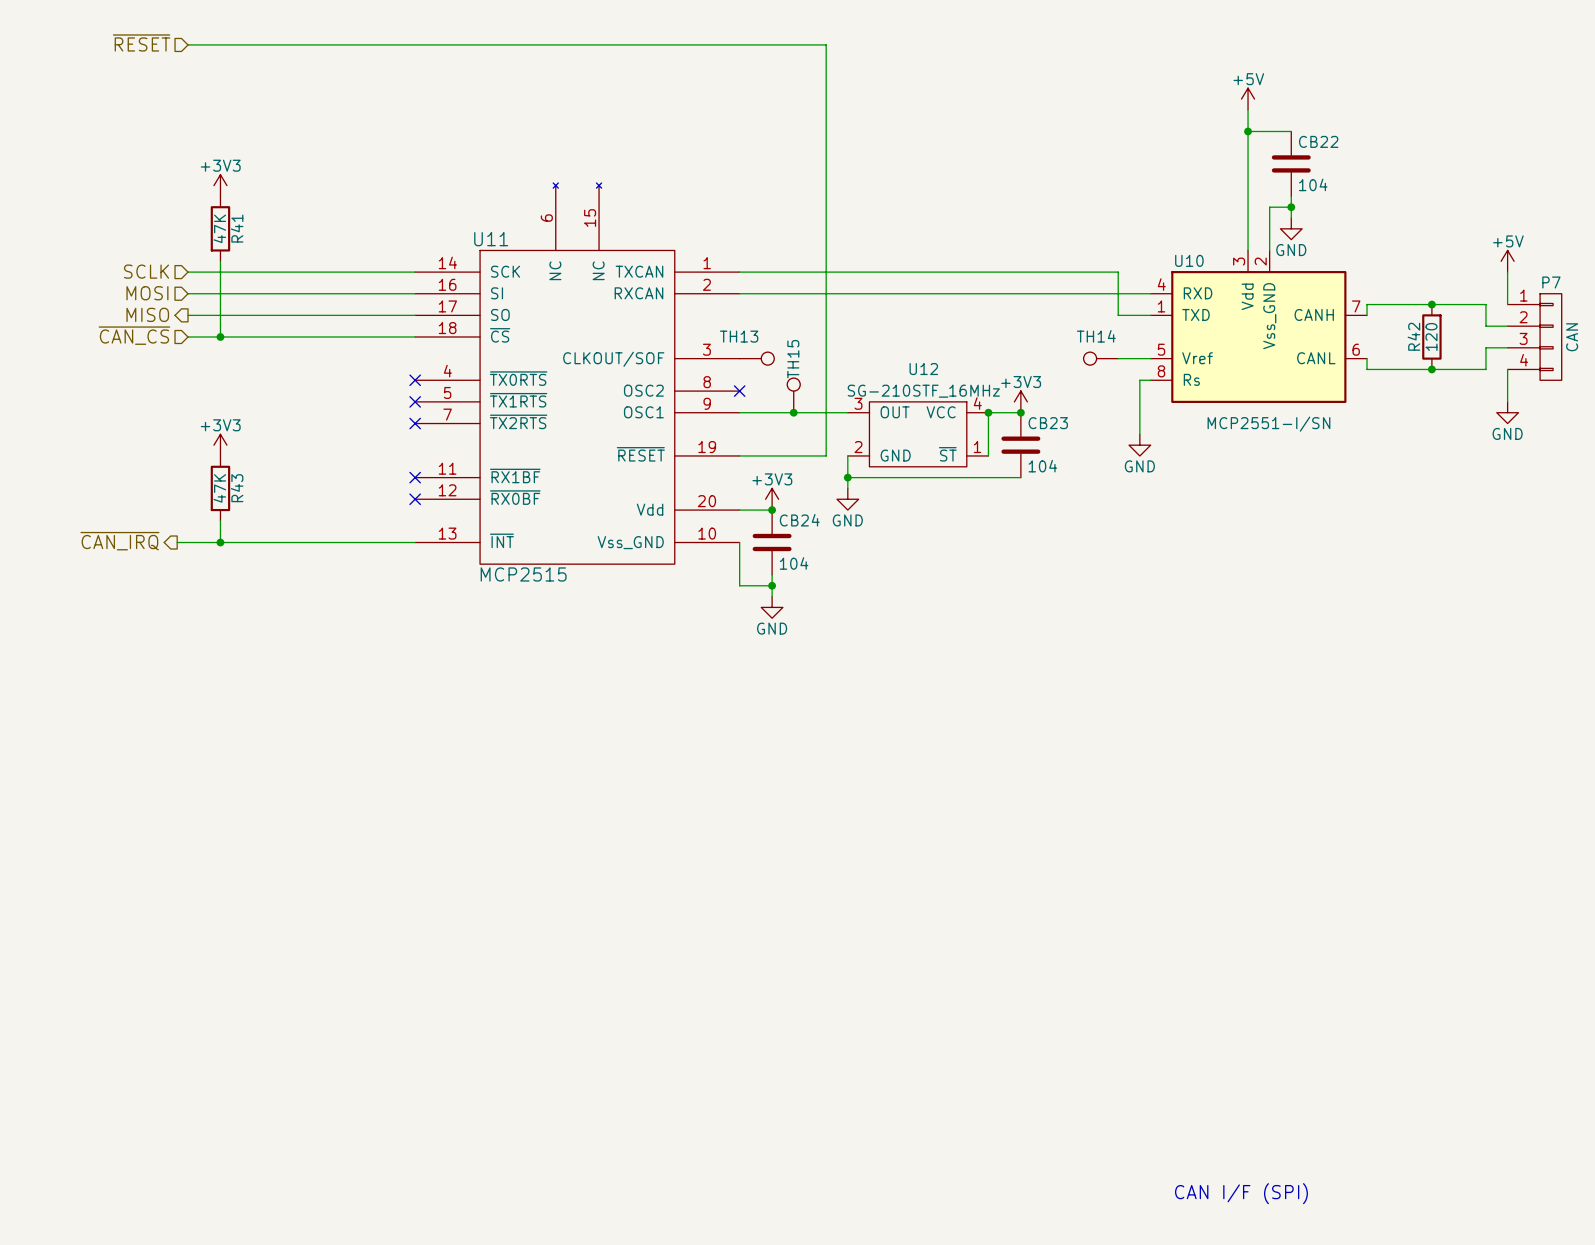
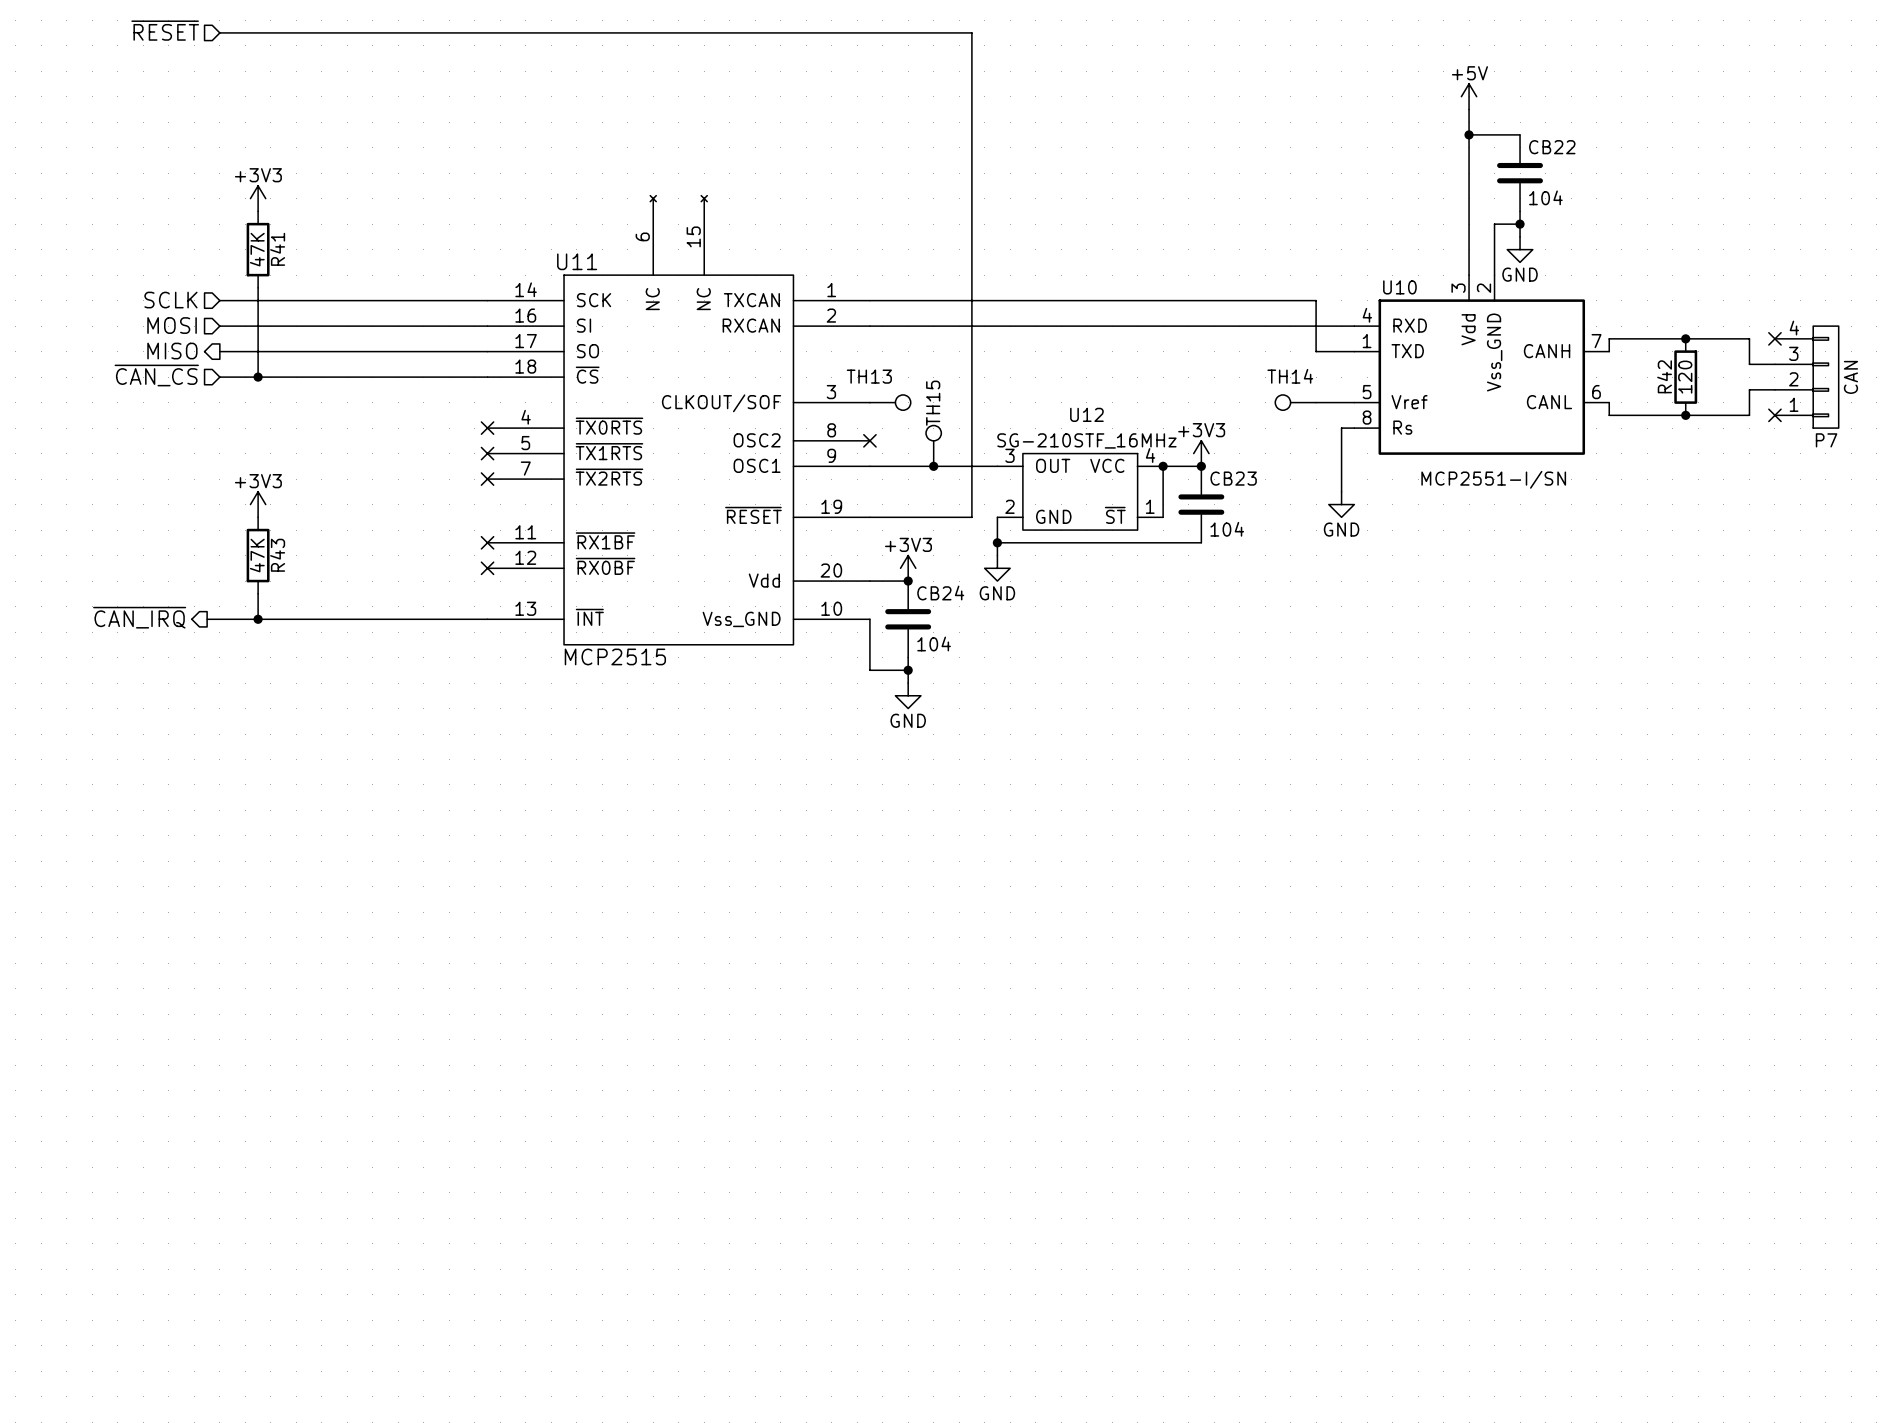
power symbol: +5V (1507, 261) -> none
wire: (1507, 272) (1507, 304) -> none
no-connect mark: none -> (1774, 338)
P7 flip: as is (1550, 337) -> up-down (1825, 377)
wire: (1507, 369) (1507, 401) -> none
no-connect mark: none -> (1774, 415)
power symbol: GND (1507, 412) -> none
text: CAN I/F (SPI) (1241, 1193) -> none

